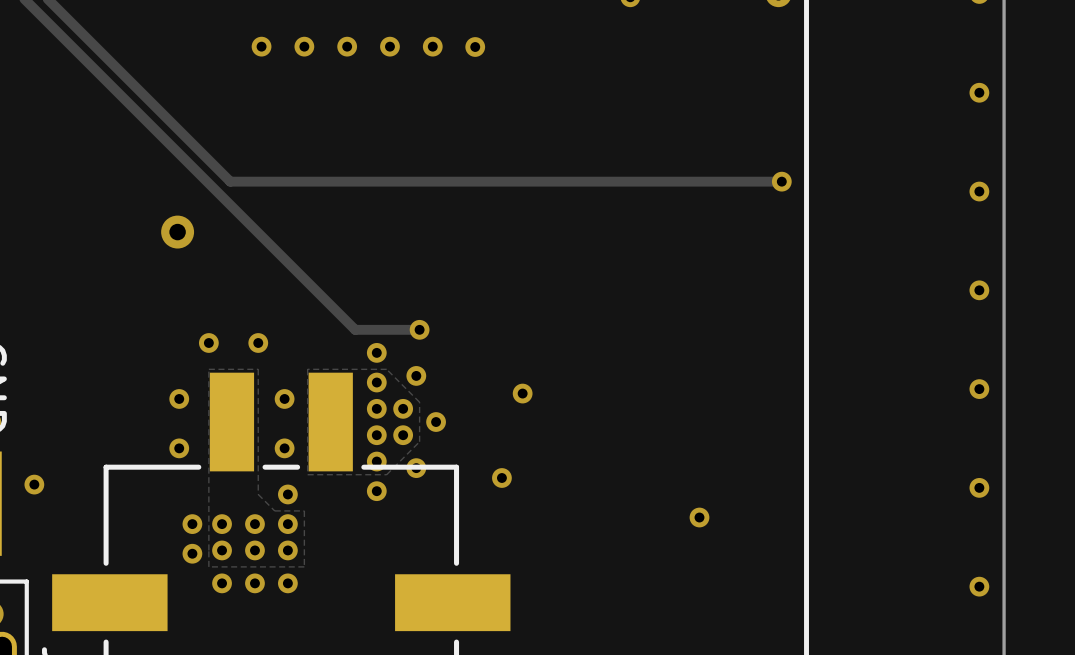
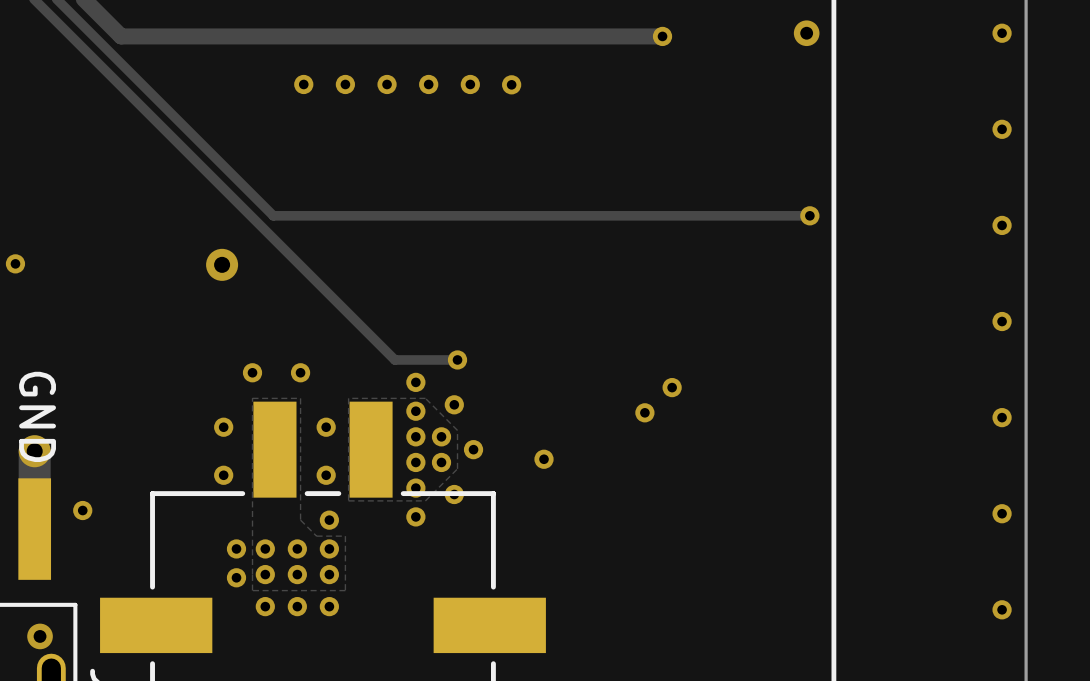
via: none -> (672, 387)
via: none -> (644, 412)
via: (522, 393) -> none
via: none -> (544, 459)
via: (501, 478) -> none
via: (699, 517) -> none

